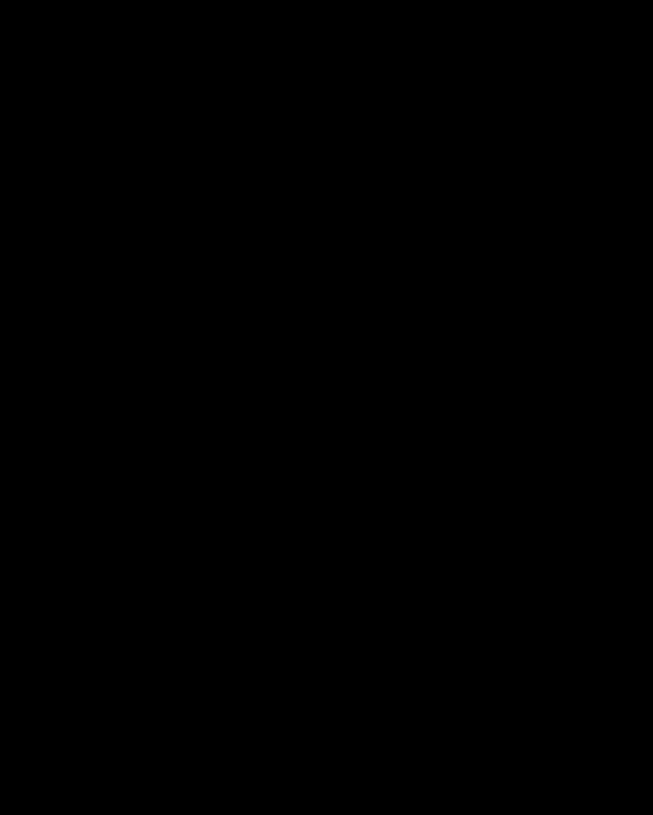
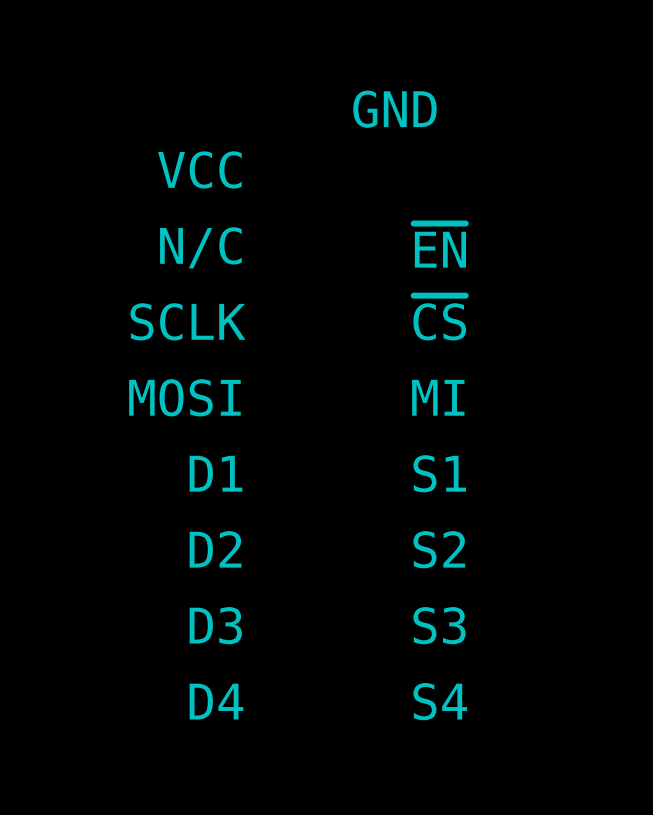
text: none -> GND (394, 109)
text: none -> VCC (199, 169)
text: none -> ~{EN} (439, 245)
text: none -> N/C (200, 247)
text: none -> ~{CS} (439, 318)
text: none -> SCLK (187, 321)
text: none -> MOSI (184, 397)
text: none -> MI (438, 397)
text: none -> D1 (215, 473)
text: none -> S1 (439, 473)
text: none -> D2 (215, 549)
text: none -> S2 (439, 549)
text: none -> D3 (215, 625)
text: none -> S3 (439, 625)
text: none -> D4 (216, 701)
text: none -> S4 (440, 701)

